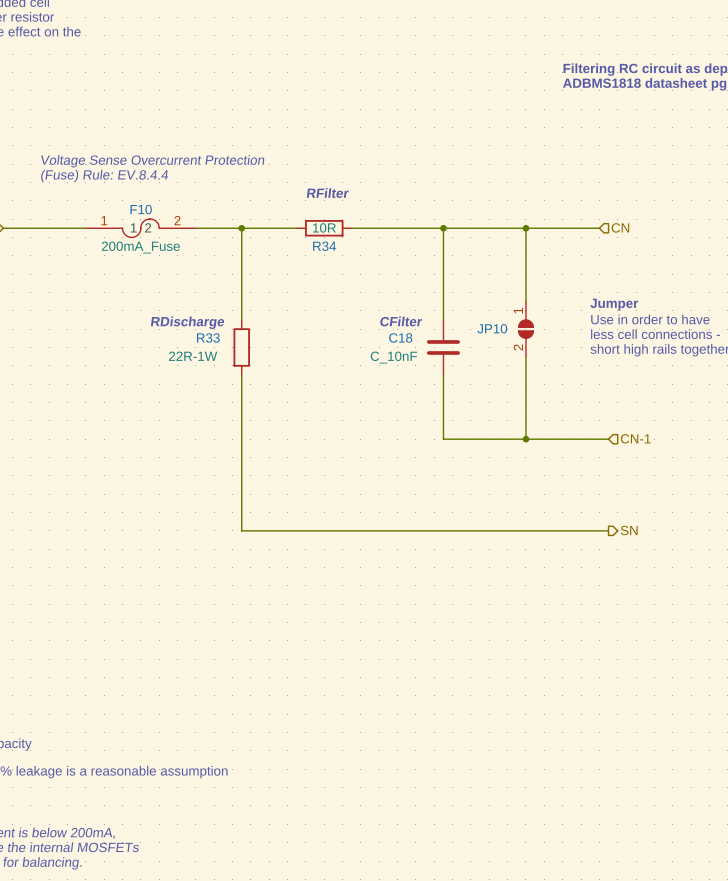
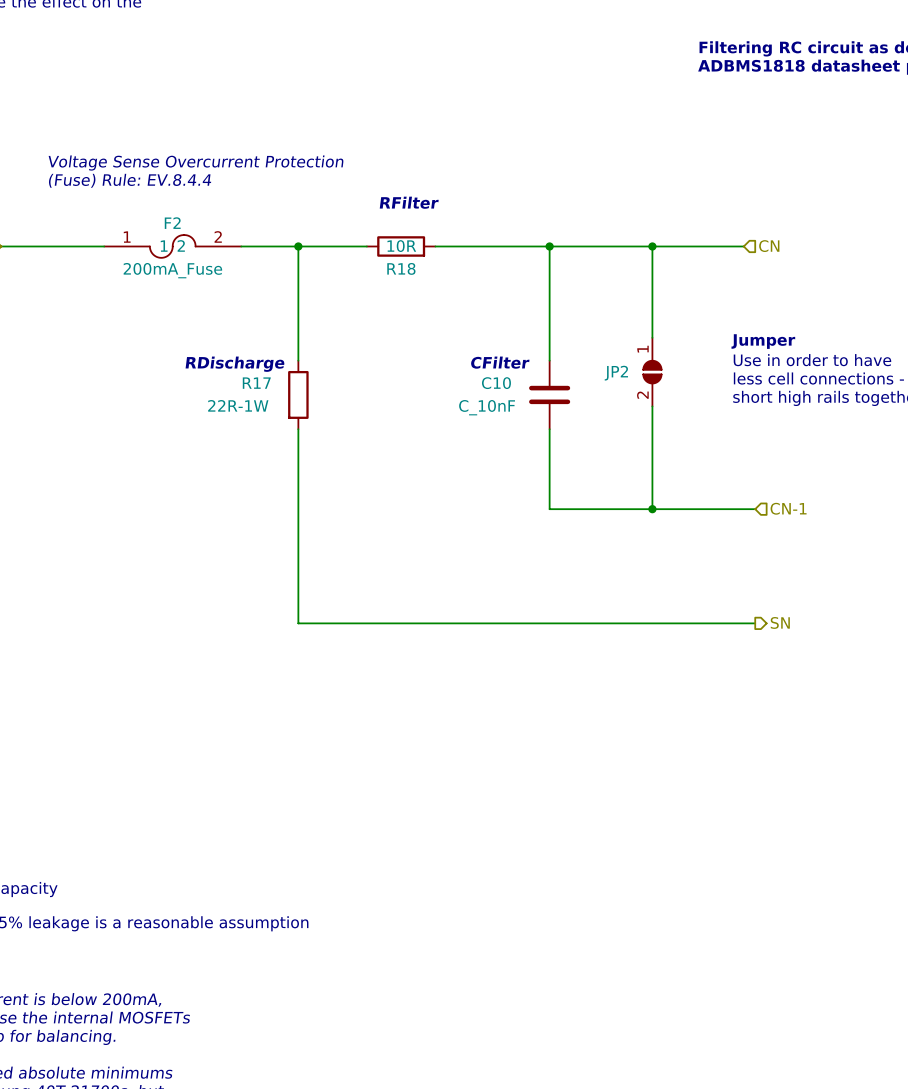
F10 name: F10 (141, 209) -> F2 (172, 223)
R34 name: R34 (324, 246) -> R18 (401, 268)
JP10 name: JP10 (492, 328) -> JP2 (616, 373)
R33 name: R33 (208, 337) -> R17 (256, 383)
C18 name: C18 (400, 337) -> C10 (496, 383)

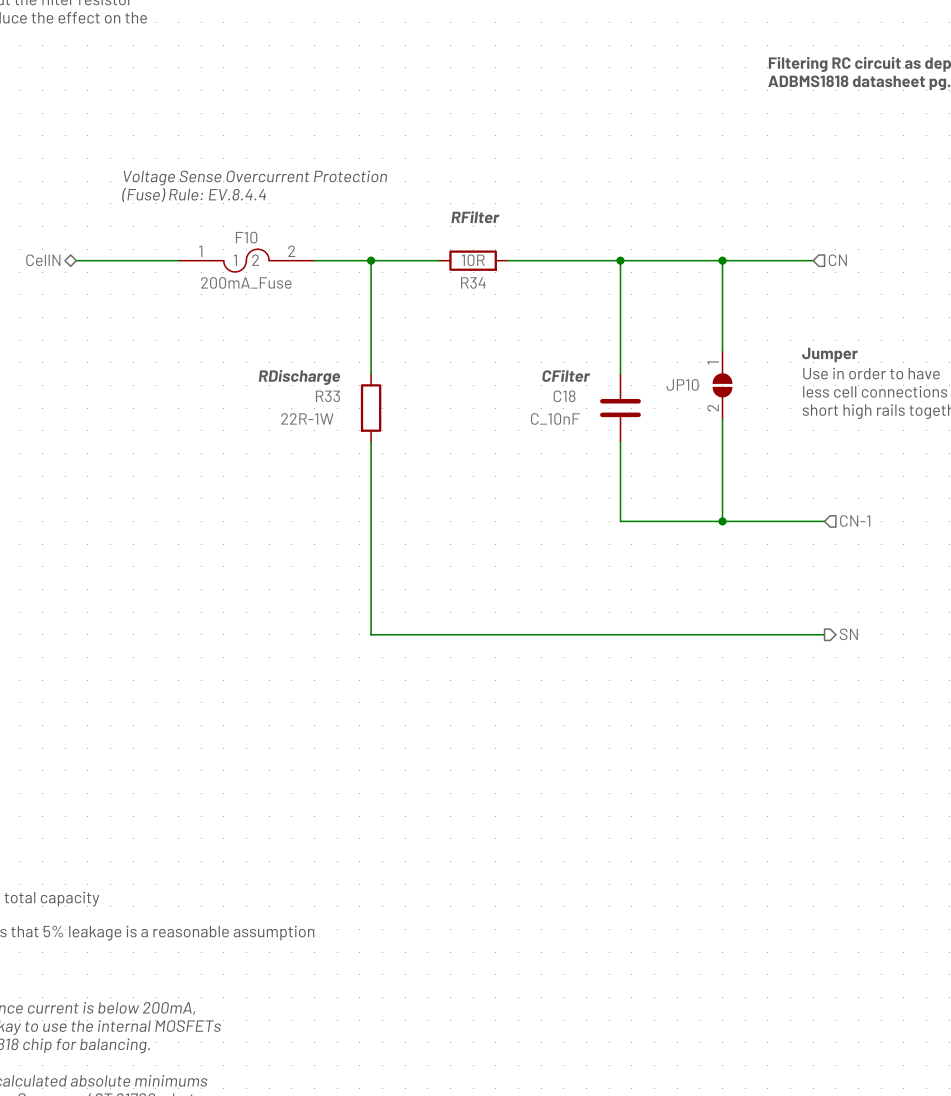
F2 name: F2 (172, 223) -> F10 (246, 237)
R18 name: R18 (401, 268) -> R34 (473, 282)
JP2 name: JP2 (616, 373) -> JP10 (682, 384)
R17 name: R17 (256, 383) -> R33 (327, 396)
C10 name: C10 (496, 383) -> C18 (564, 396)

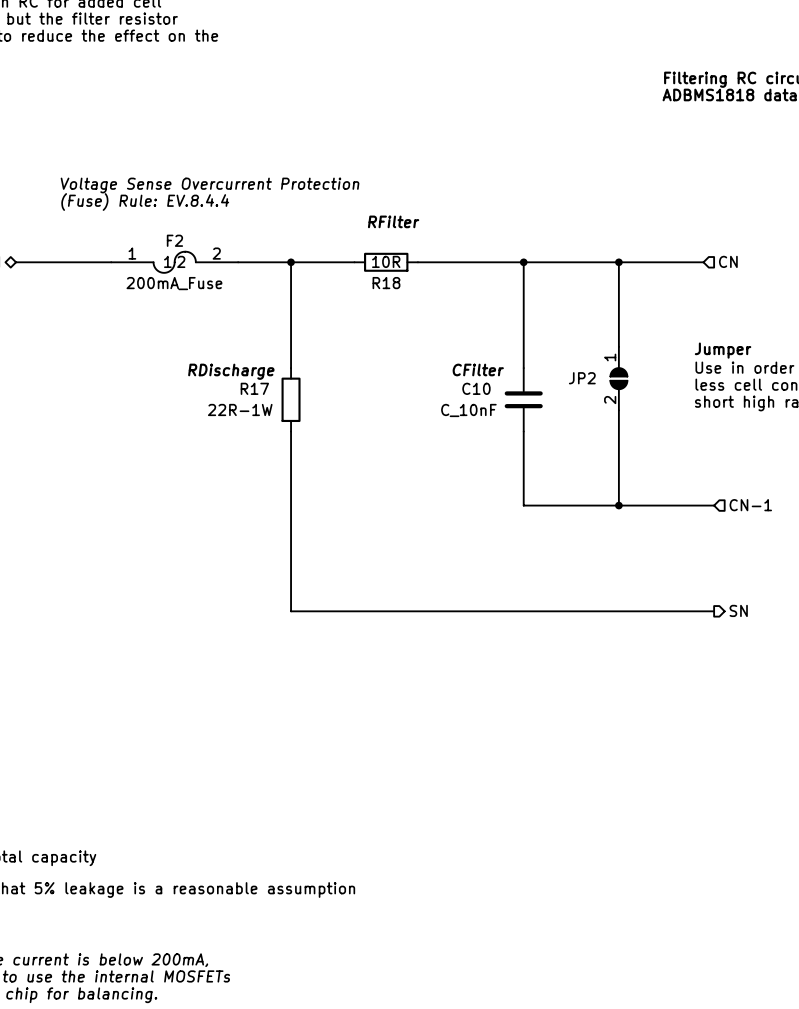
F10 name: F10 (246, 237) -> F2 (174, 240)
R34 name: R34 (473, 282) -> R18 (386, 283)
JP10 name: JP10 (682, 384) -> JP2 (582, 378)
R33 name: R33 (327, 396) -> R17 (254, 388)
C18 name: C18 (564, 396) -> C10 (476, 388)

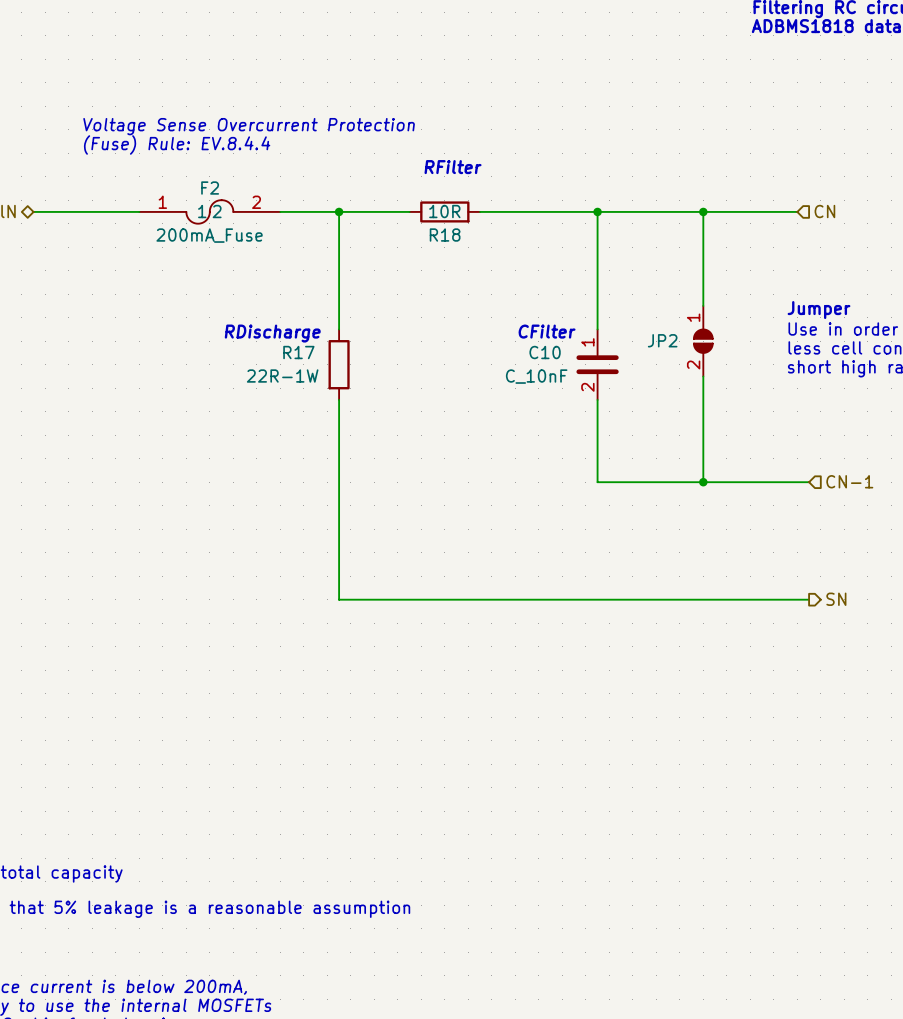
C10 pin number: none -> 1 (587, 342)
C10 pin number: none -> 2 (587, 387)

